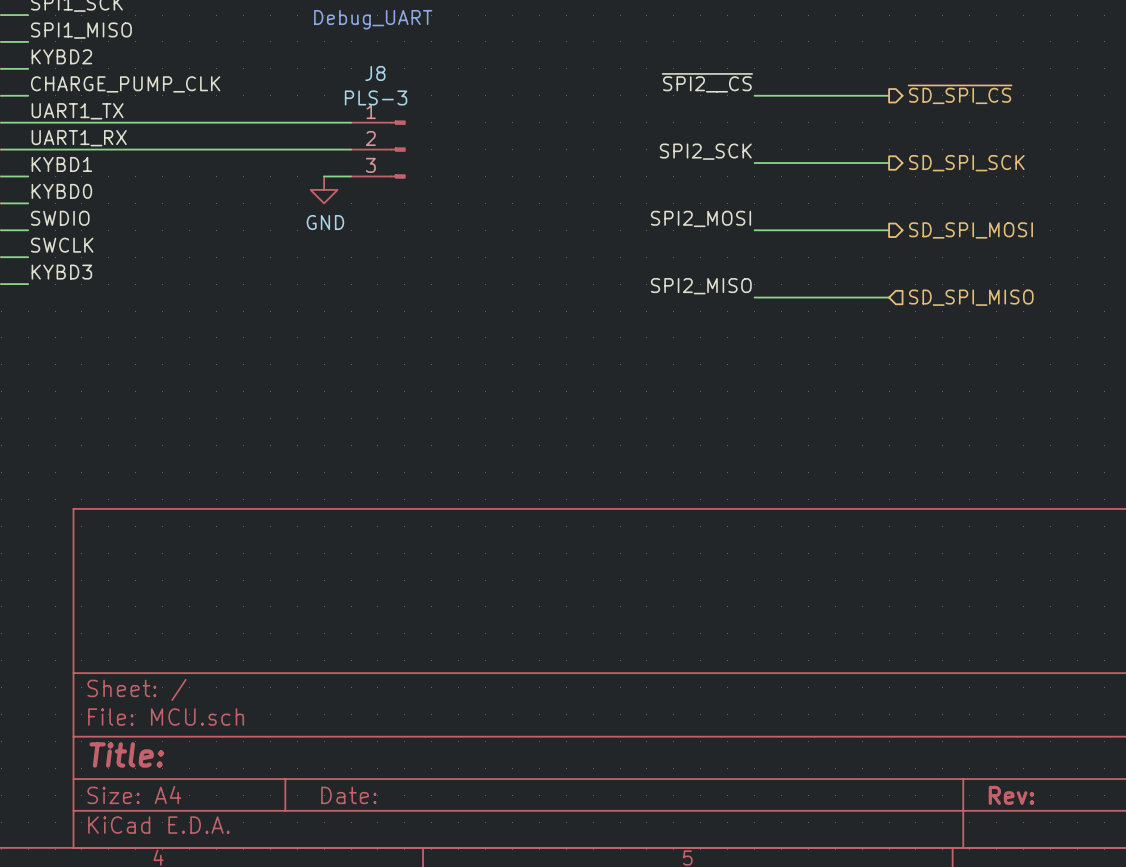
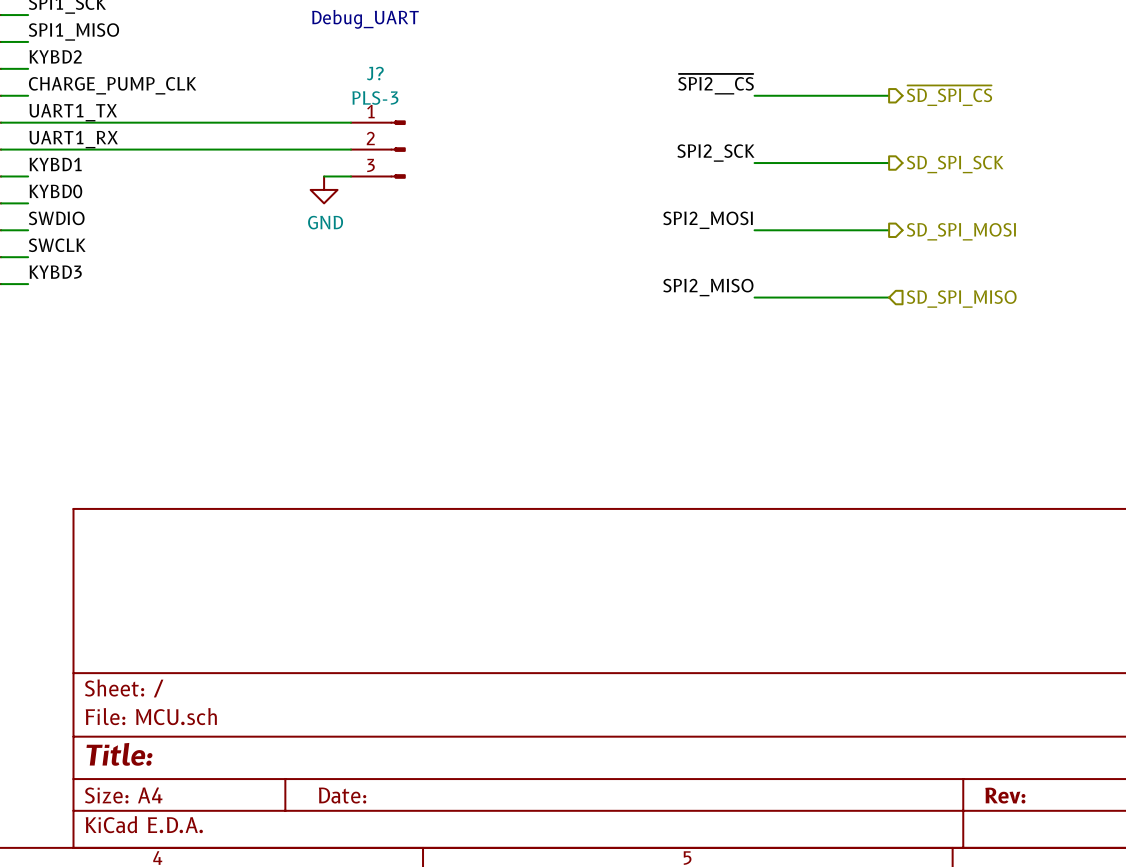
J8 name: J8 (375, 73) -> J? (375, 73)

